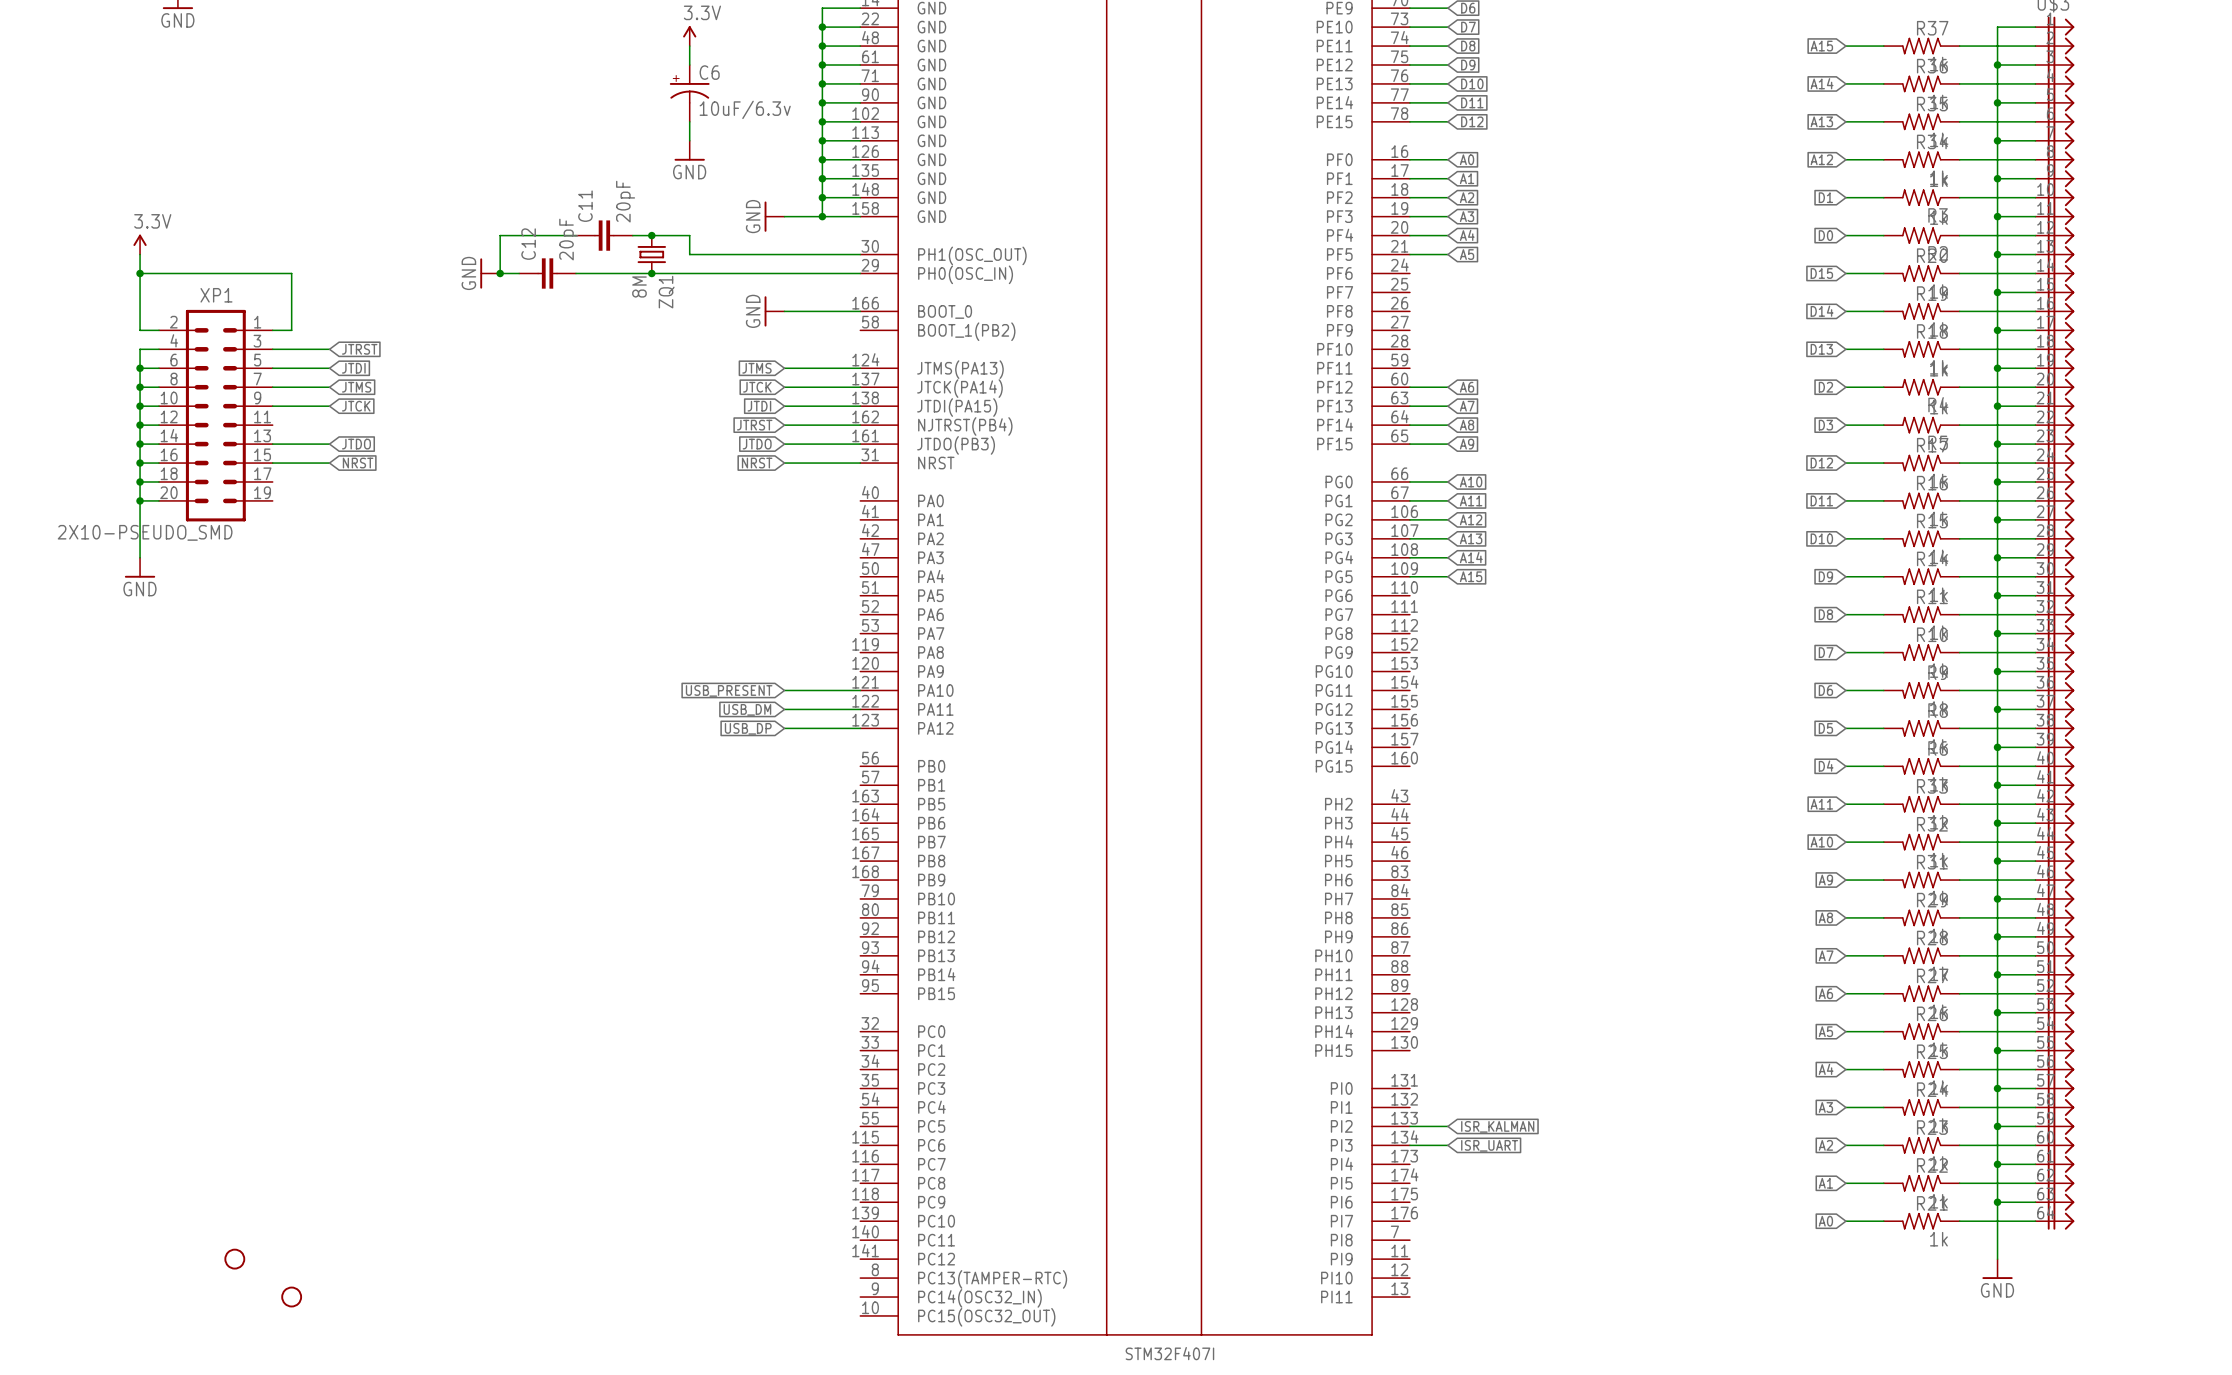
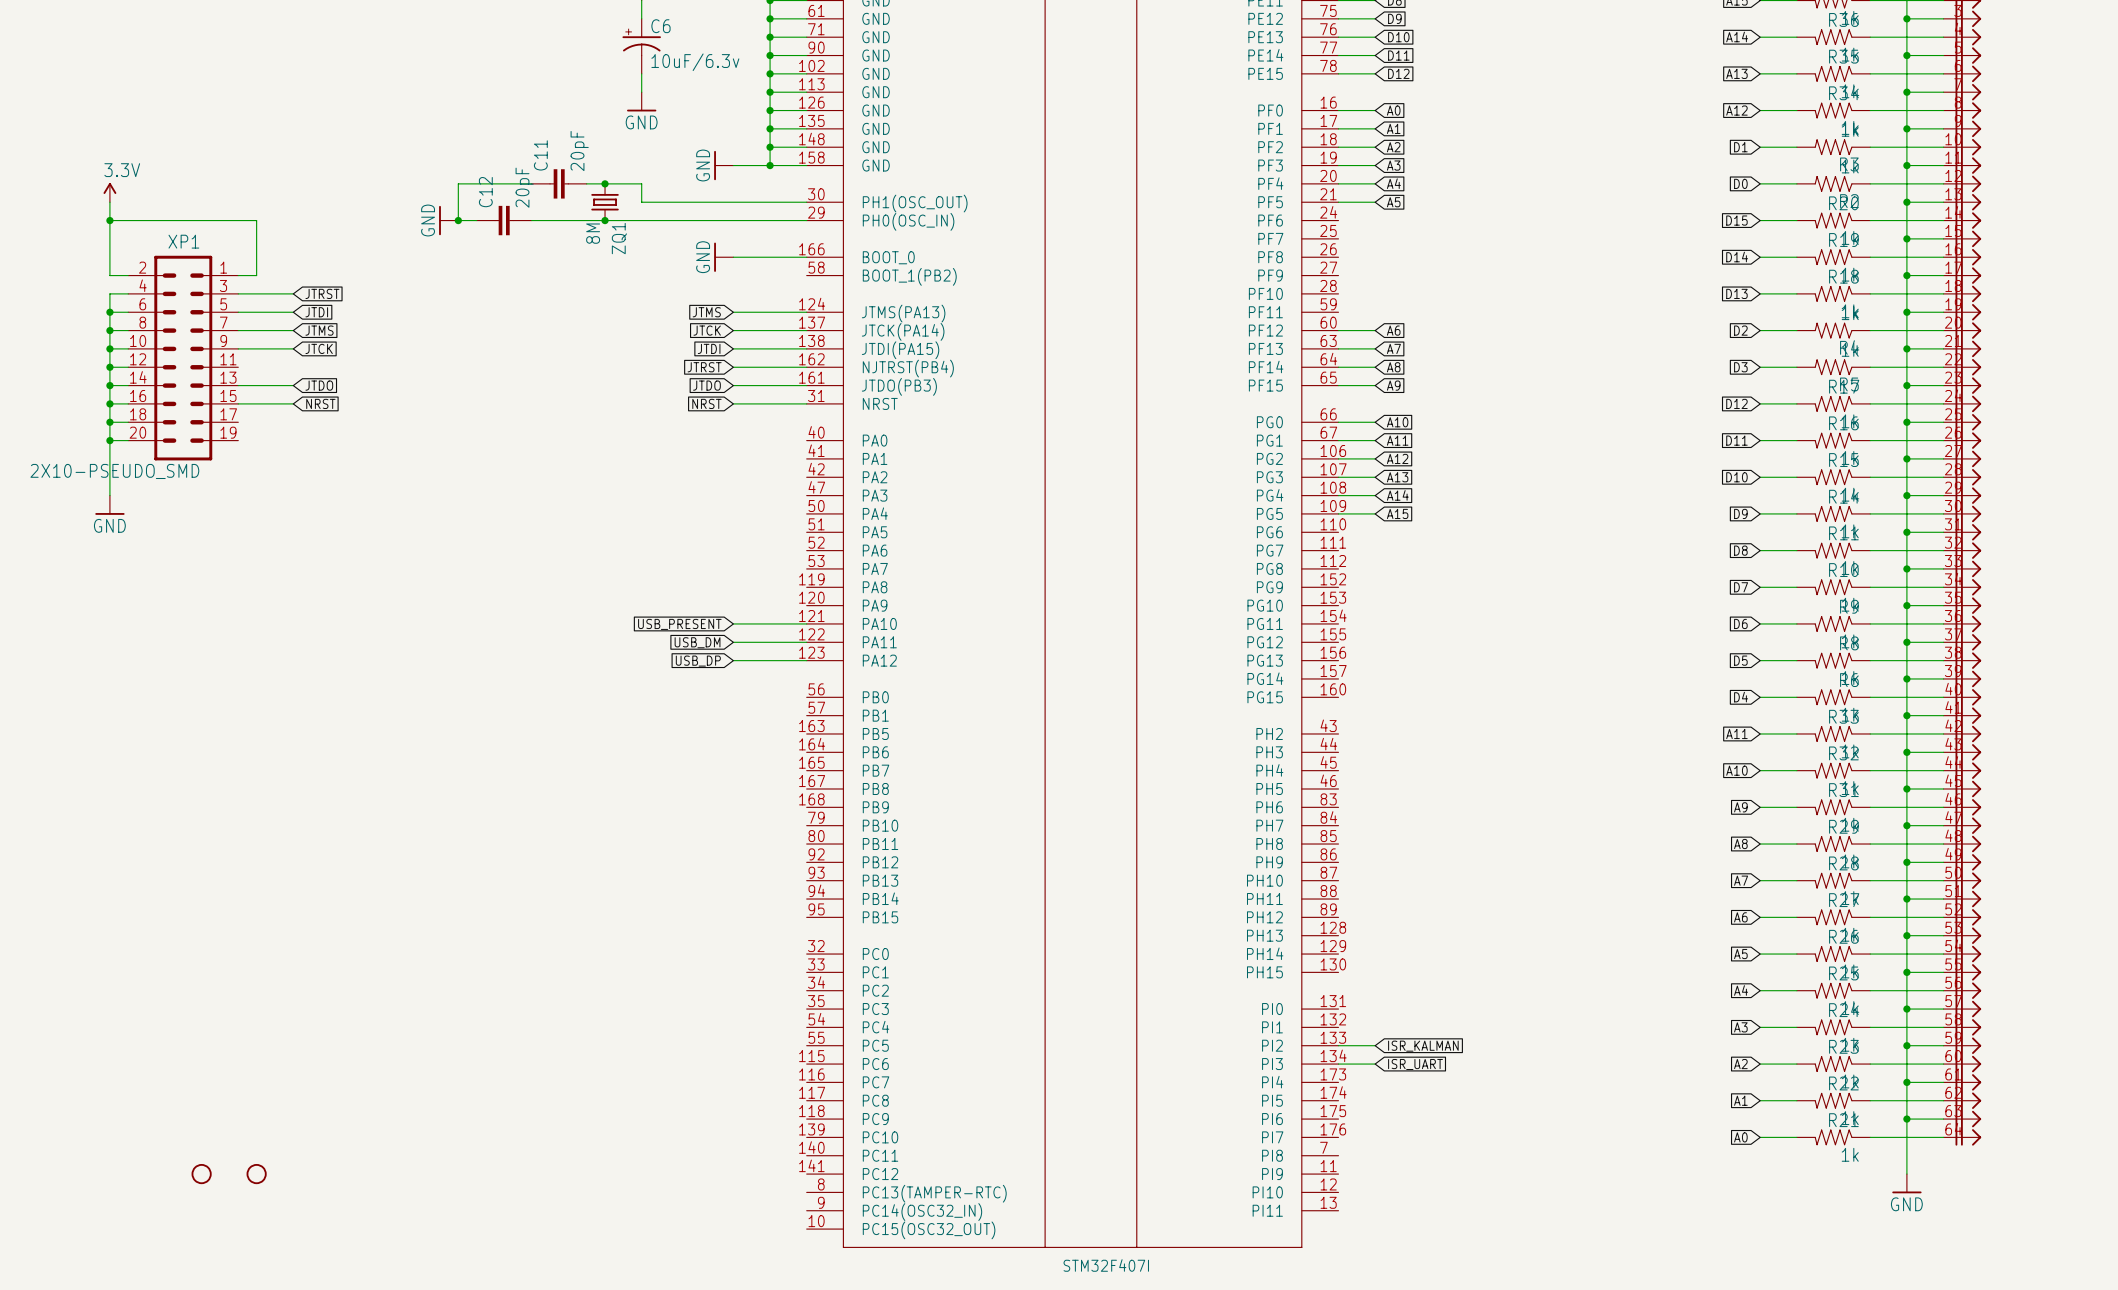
part position: (291, 1297) -> (256, 1174)

